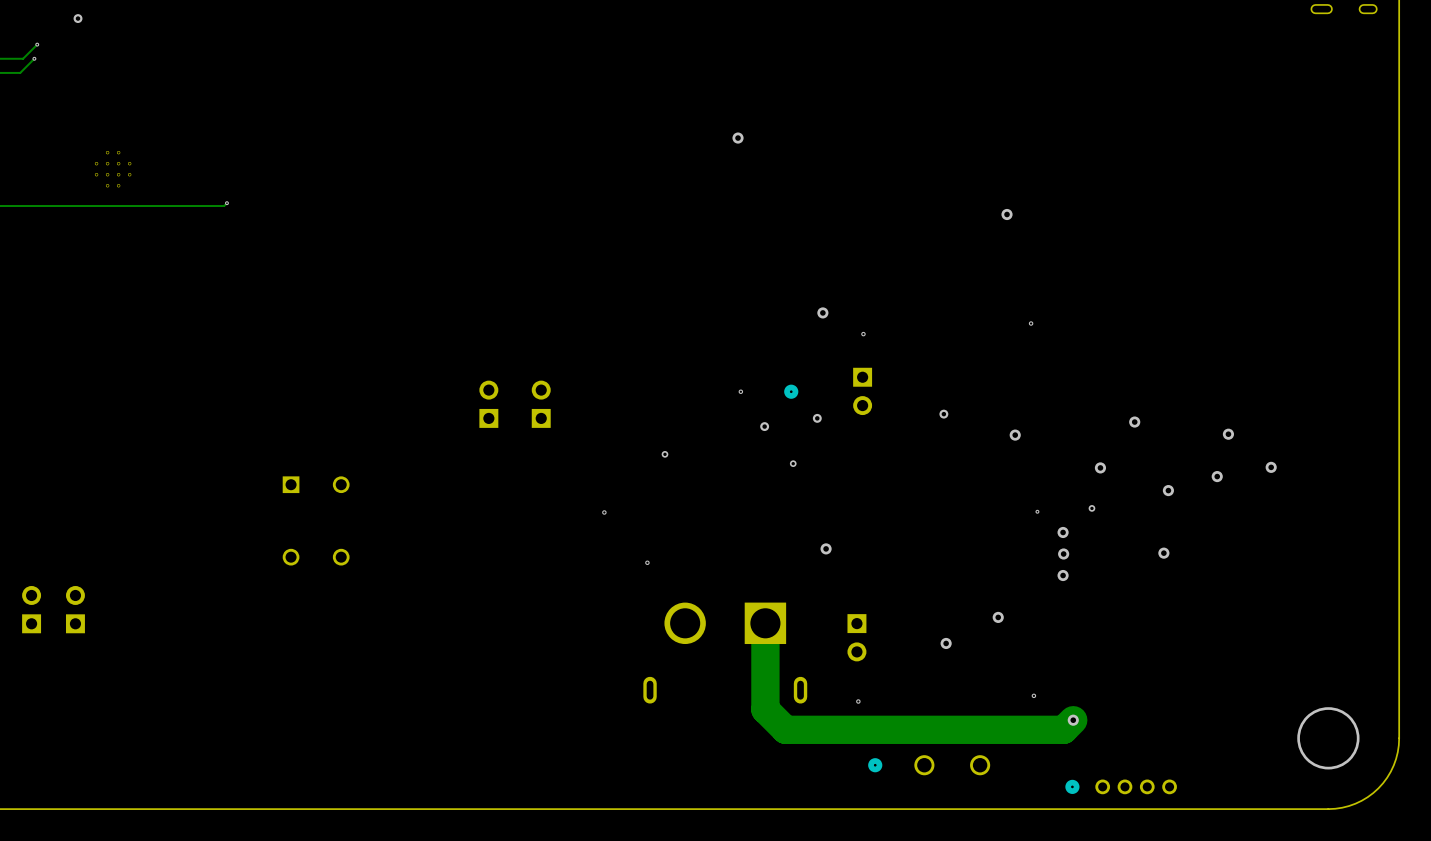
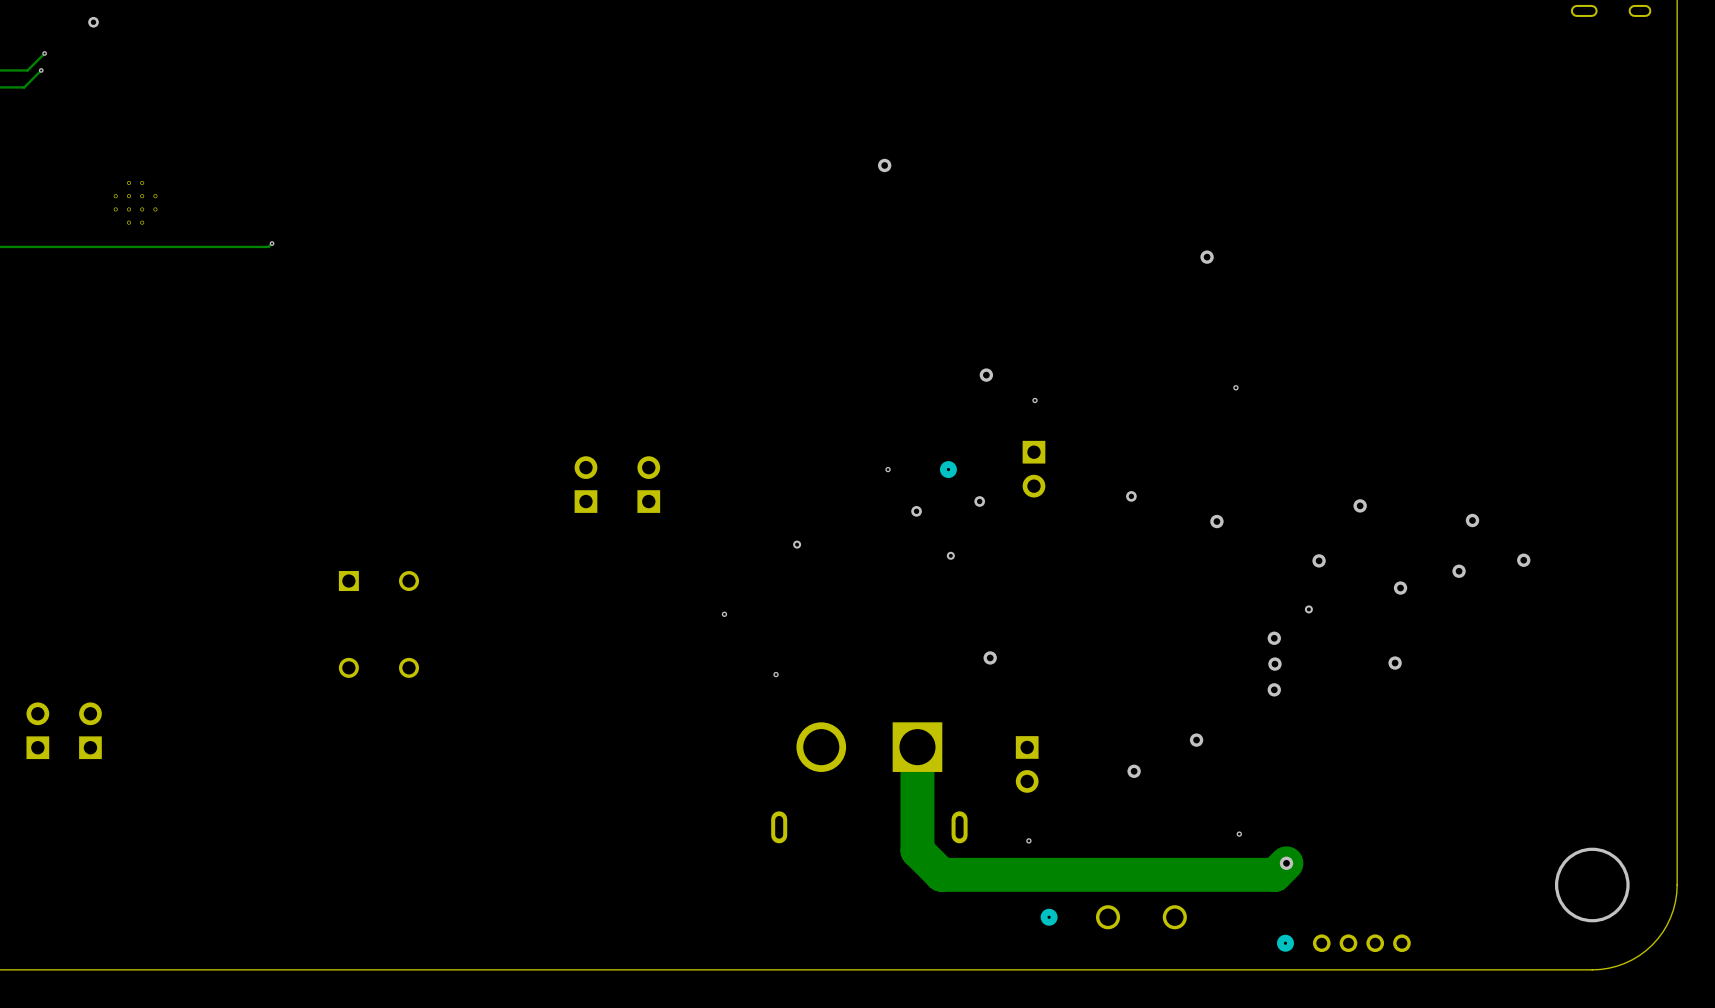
via: (1037, 511) -> none

